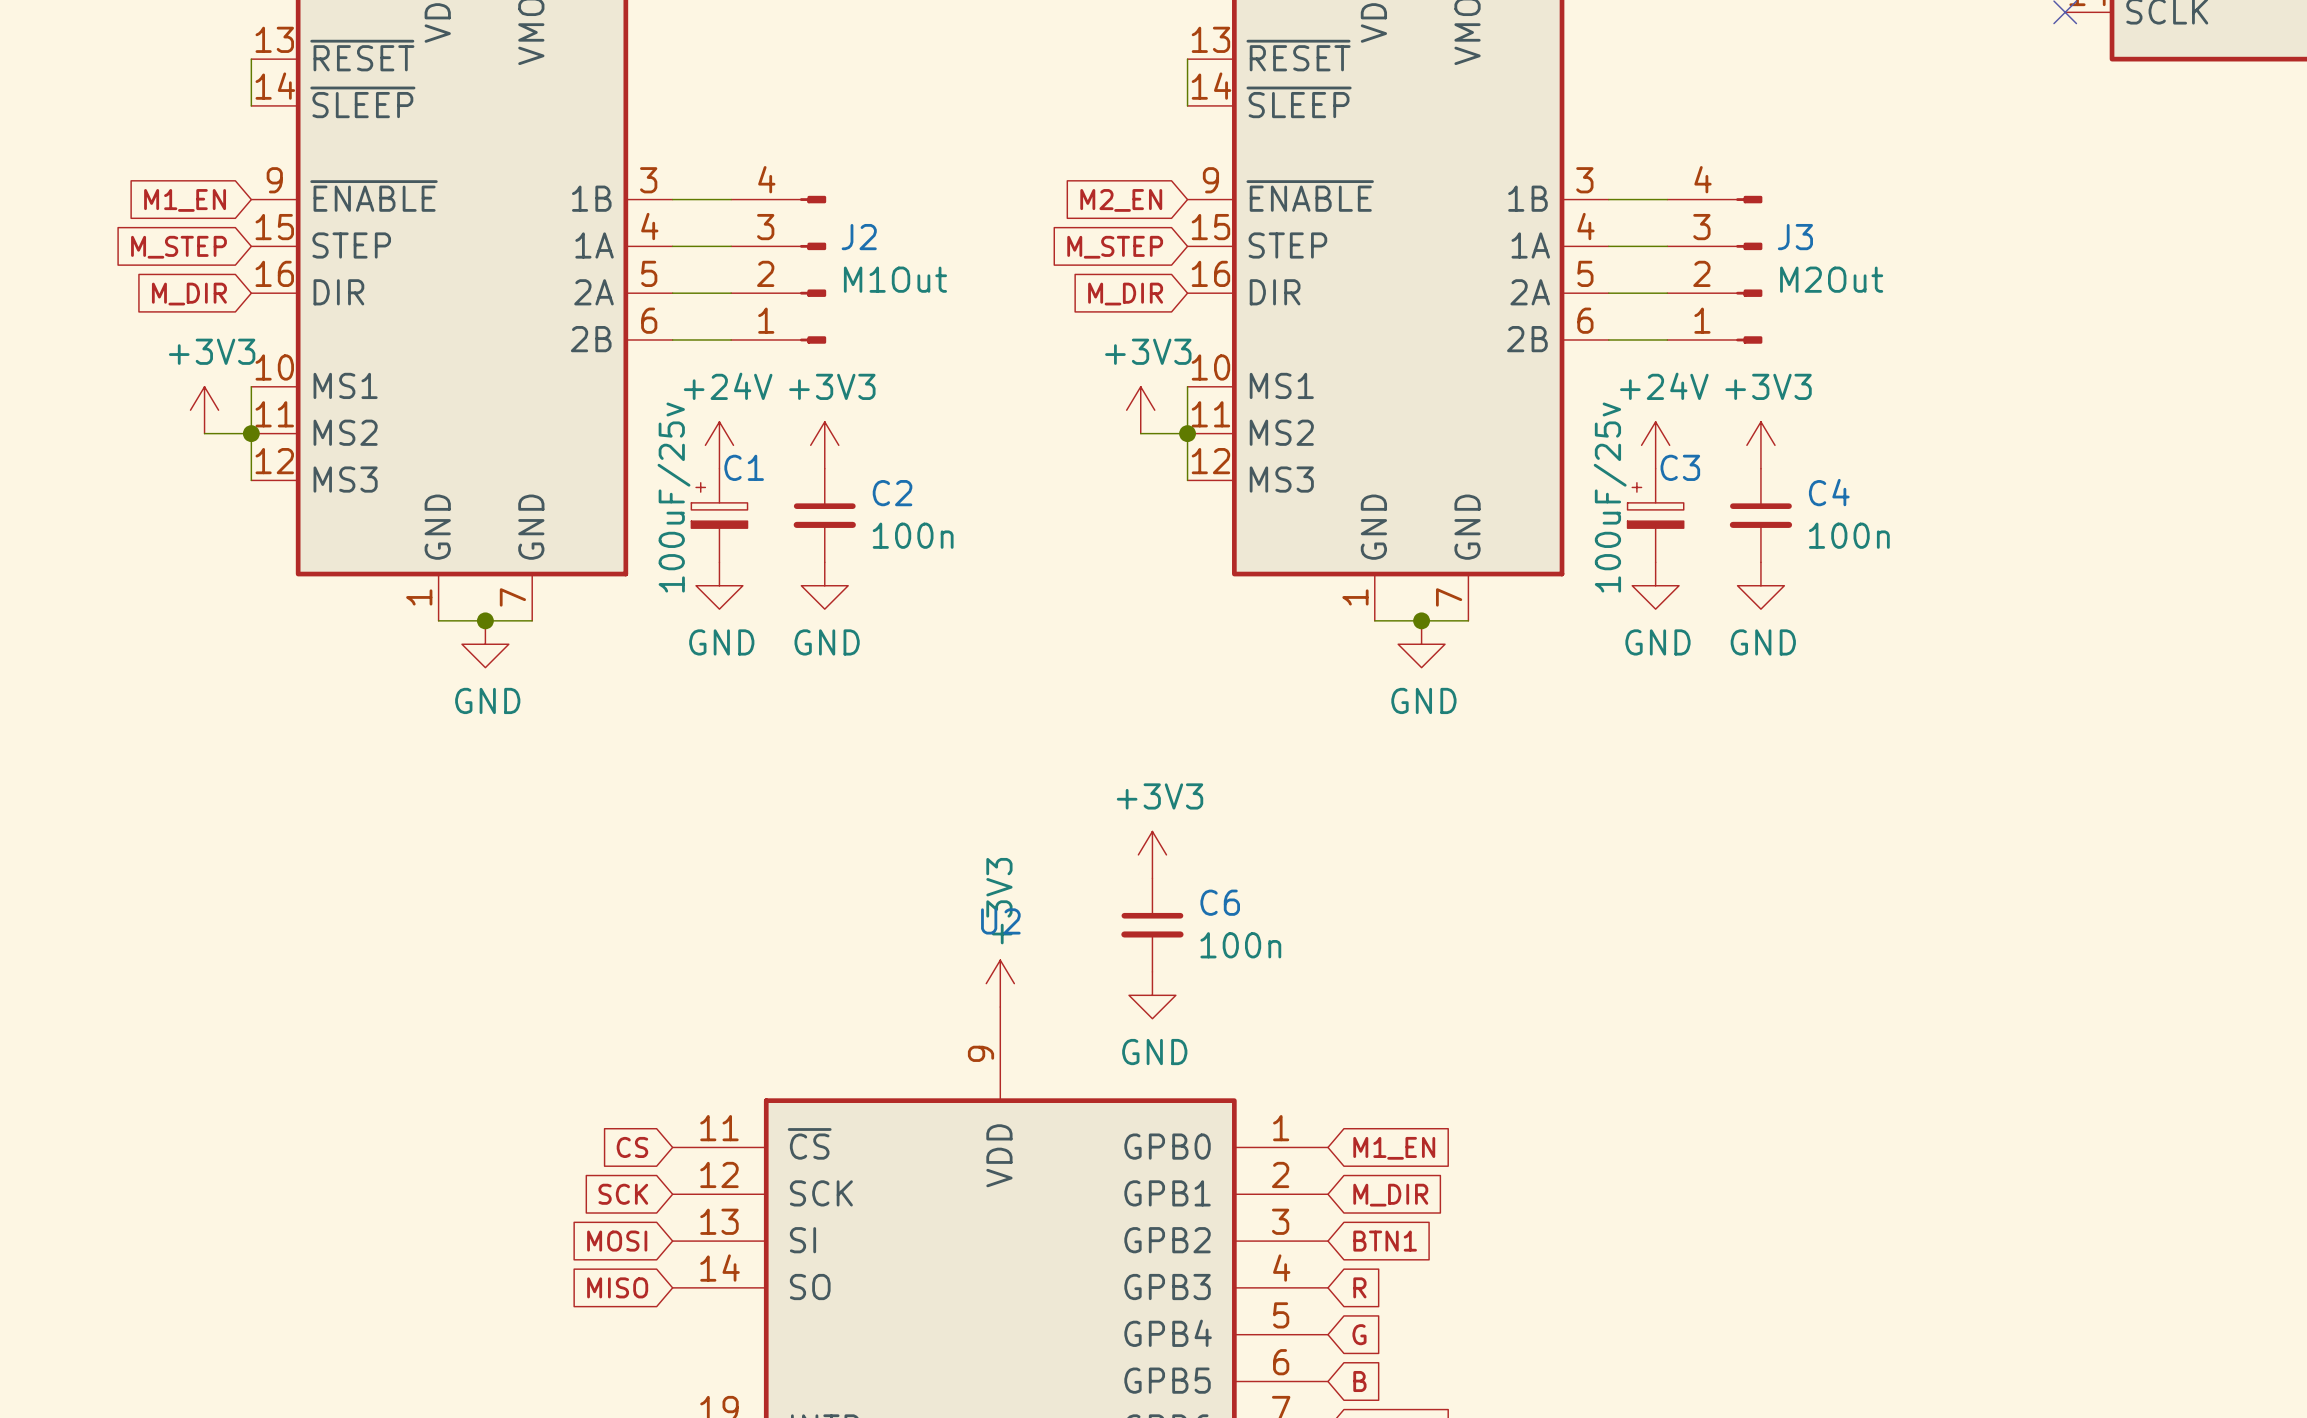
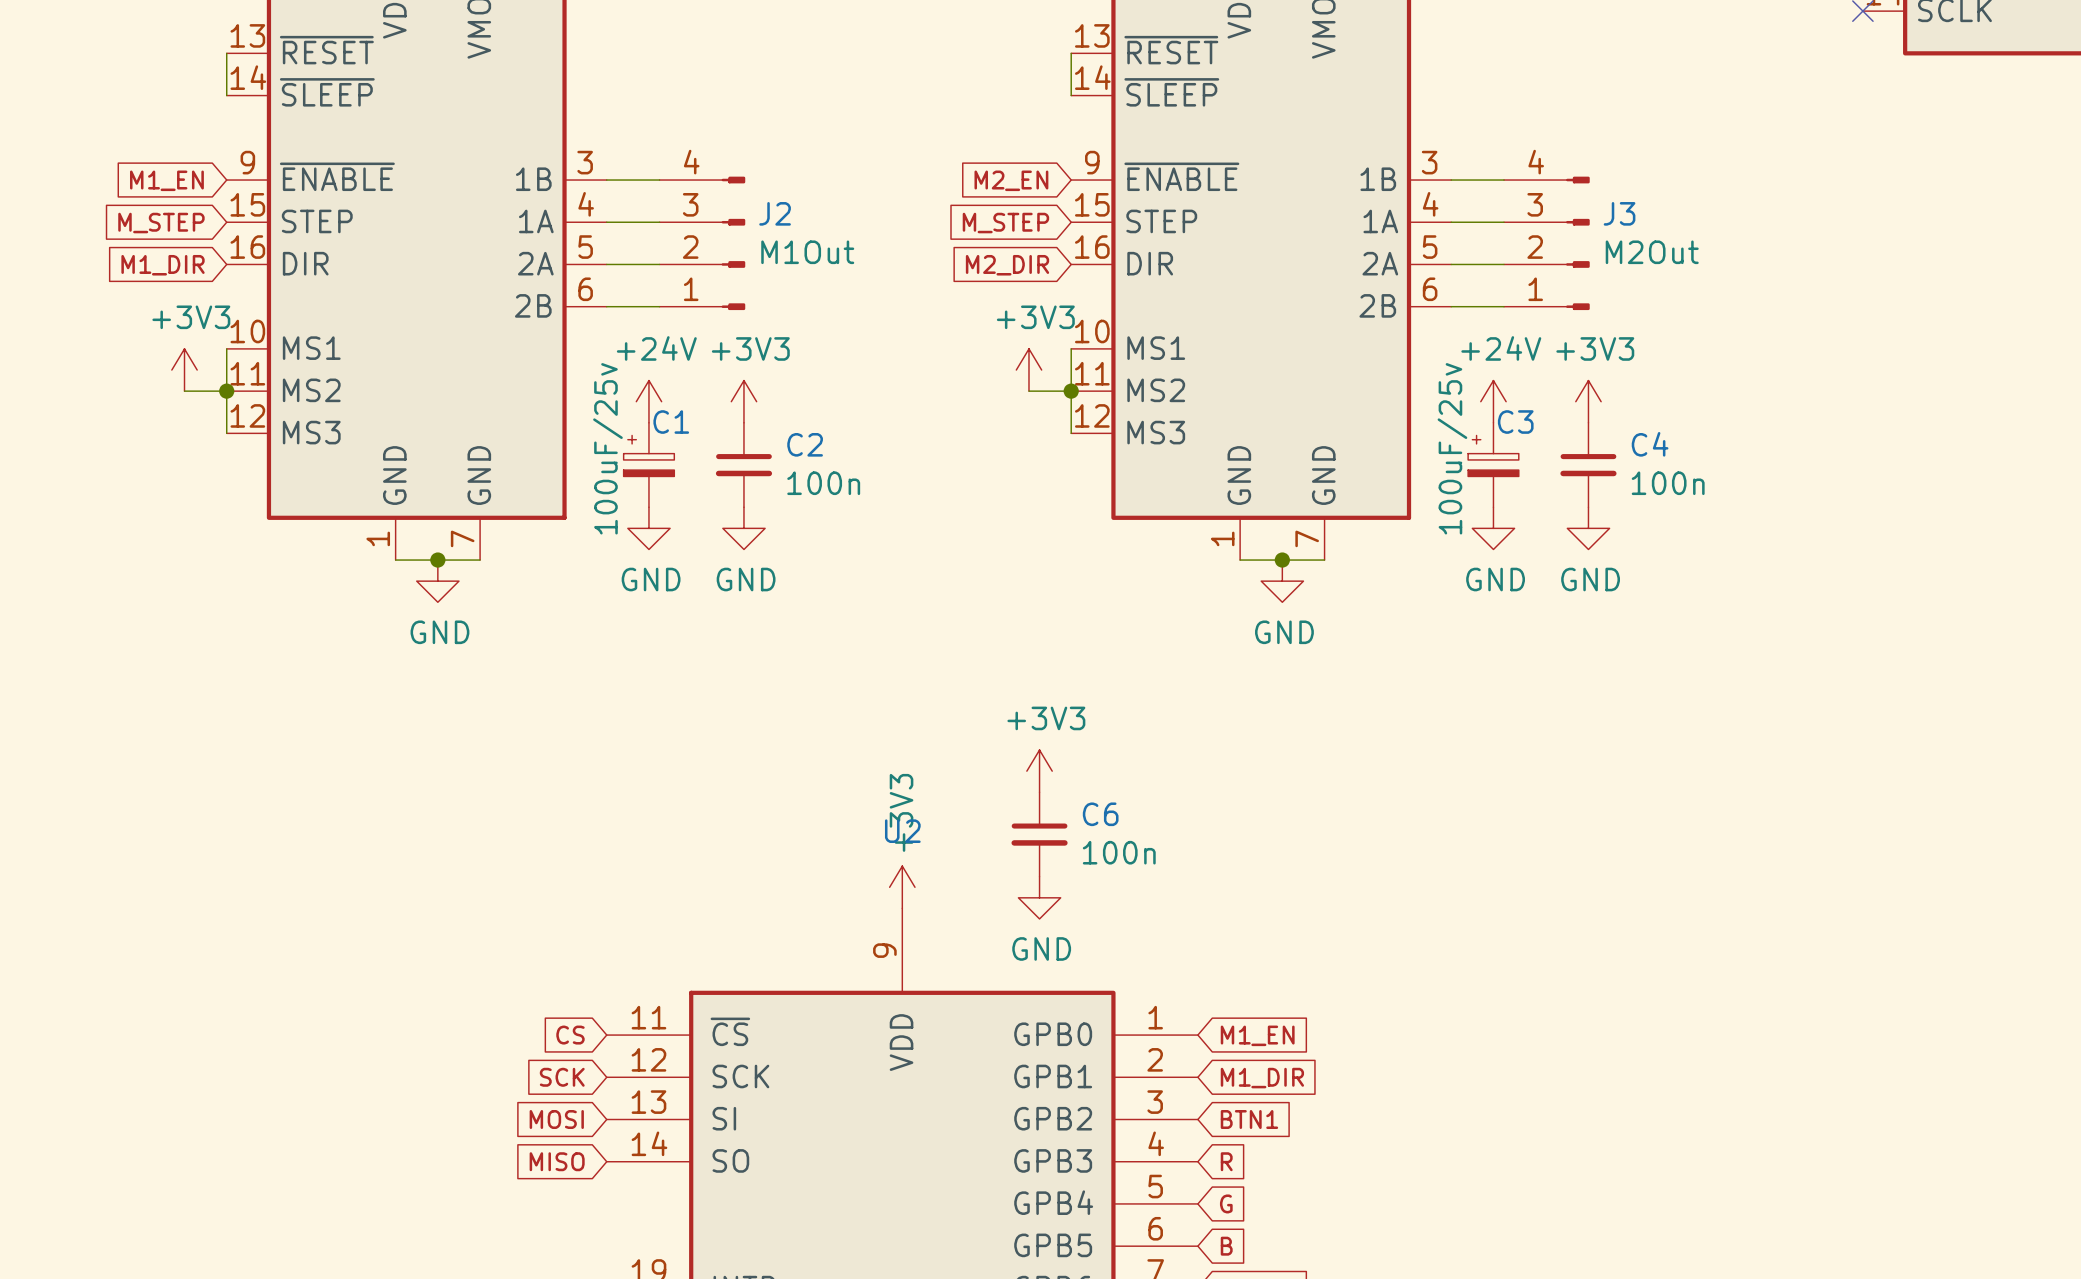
global label: M_DIR (189, 294) -> M1_DIR (163, 265)
global label: M_DIR (1125, 294) -> M2_DIR (1007, 265)
global label: M_DIR (1390, 1195) -> M1_DIR (1262, 1078)

